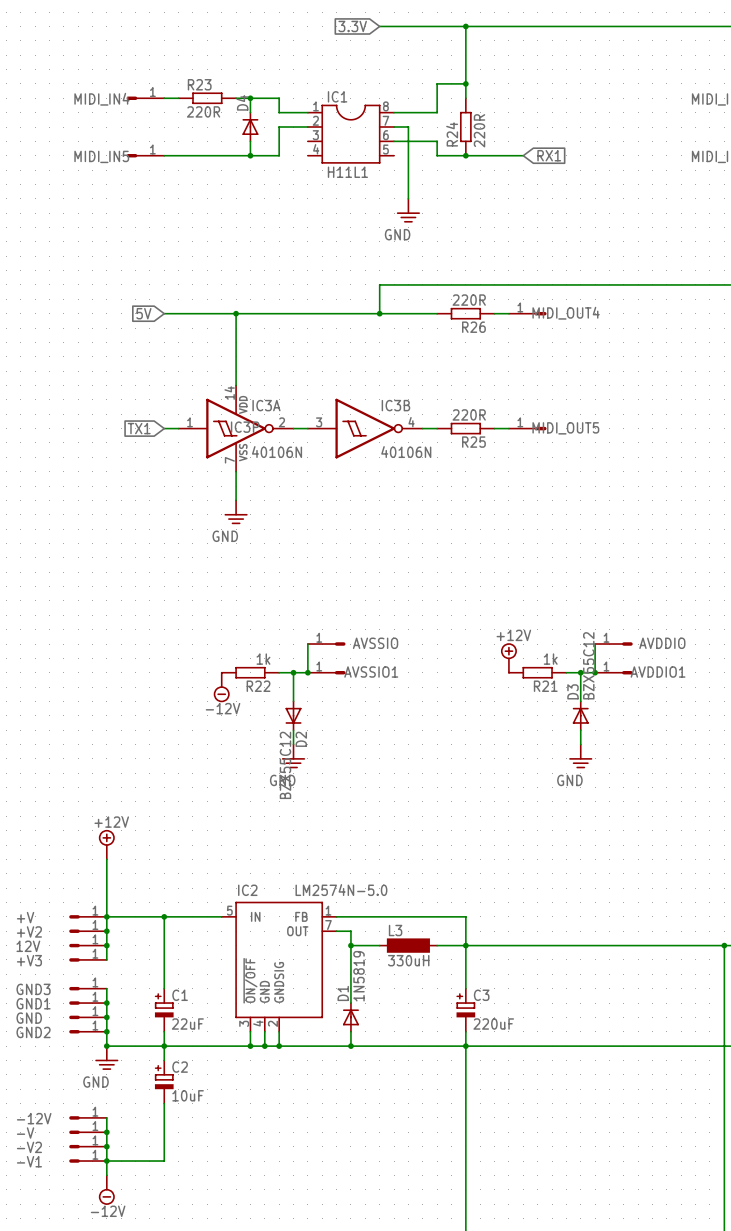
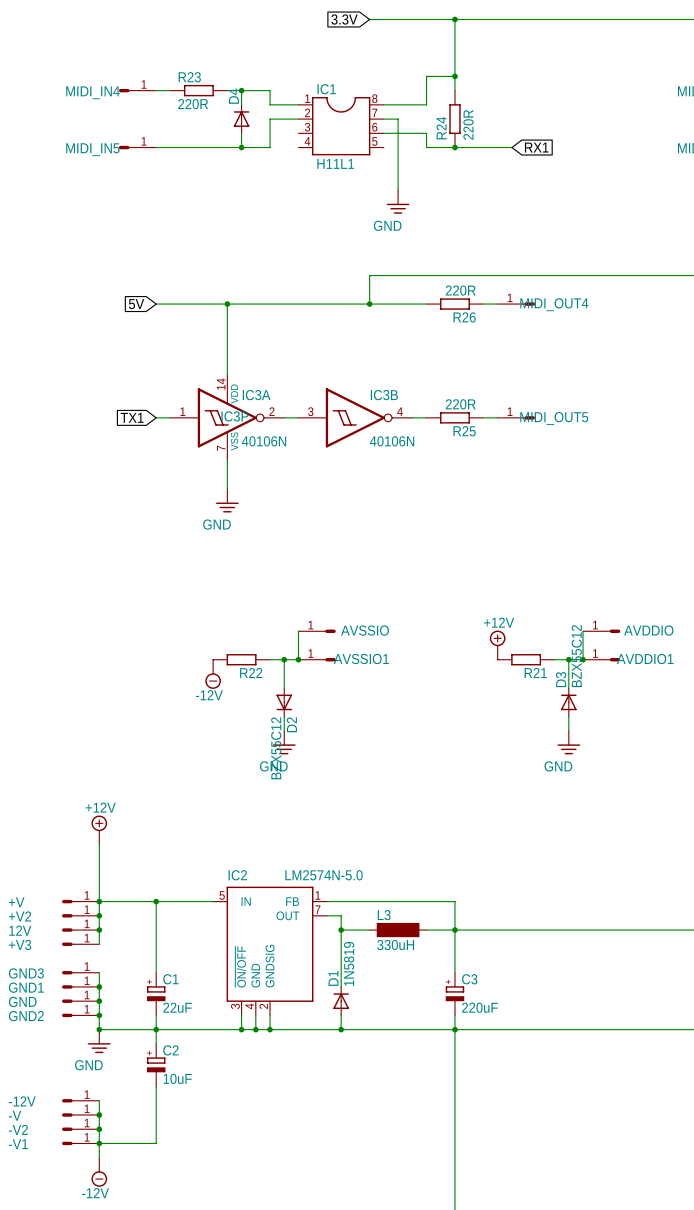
R22 value: 1k (263, 659) -> none
R21 value: 1k (550, 659) -> none

